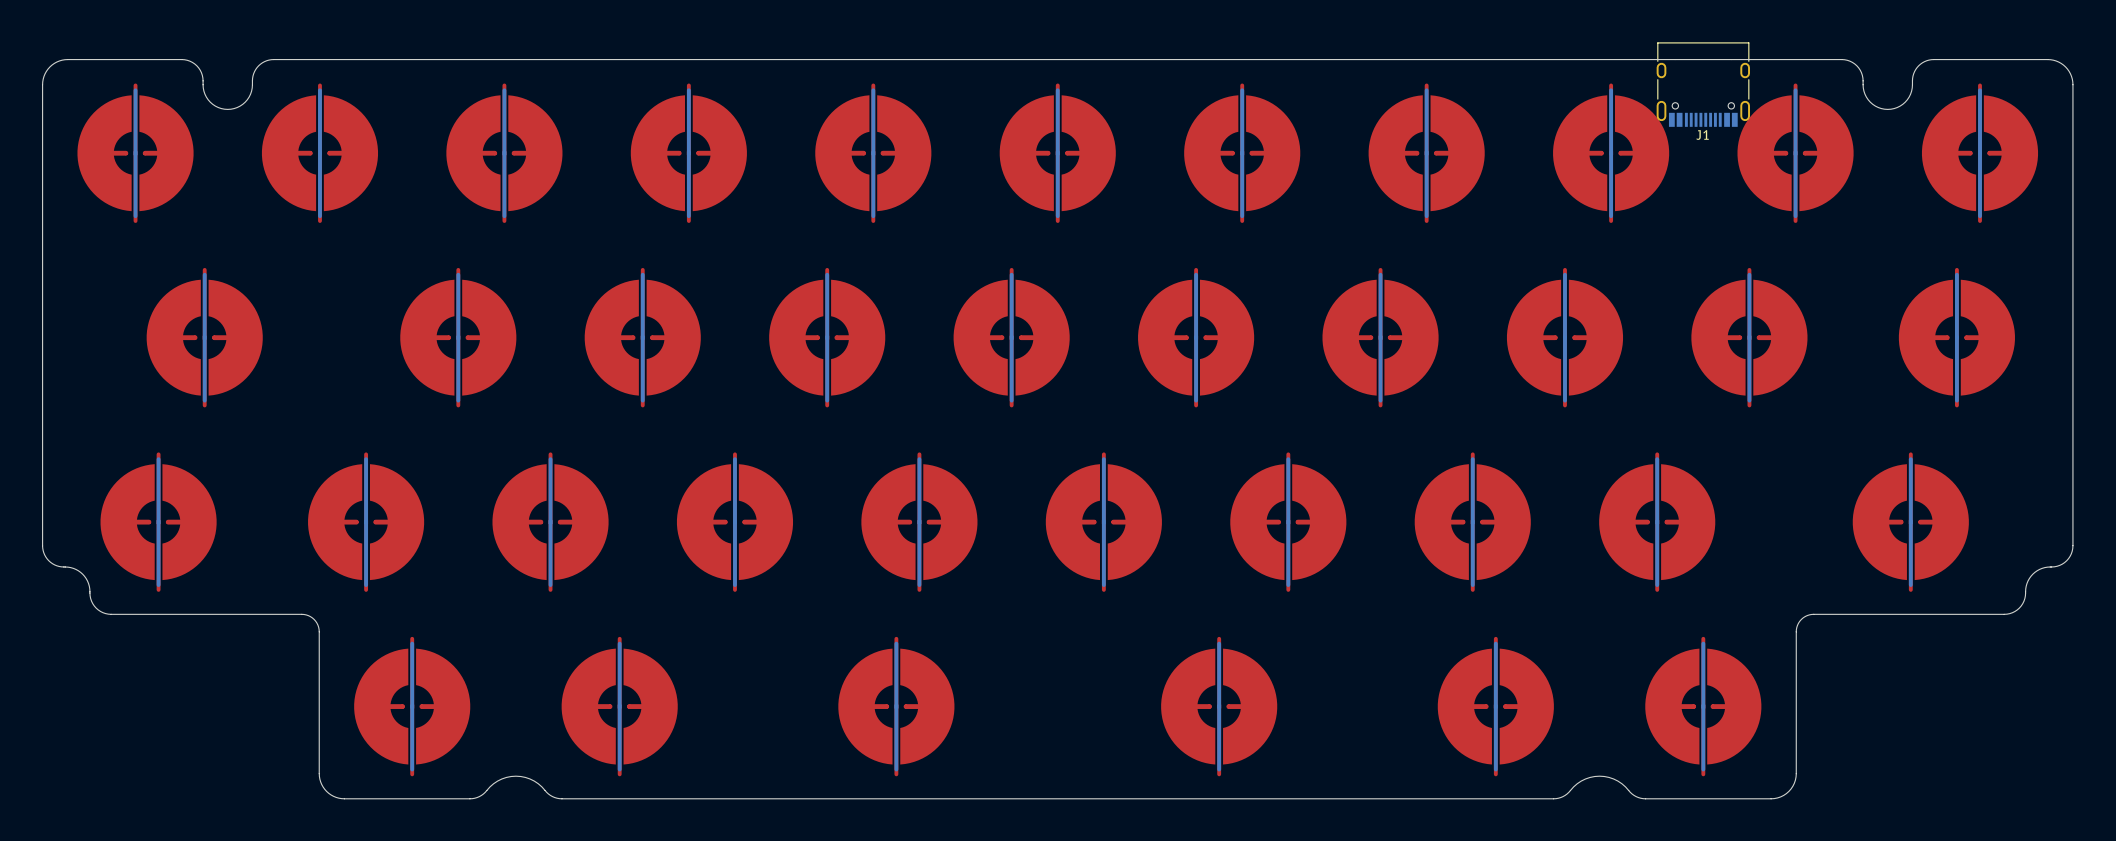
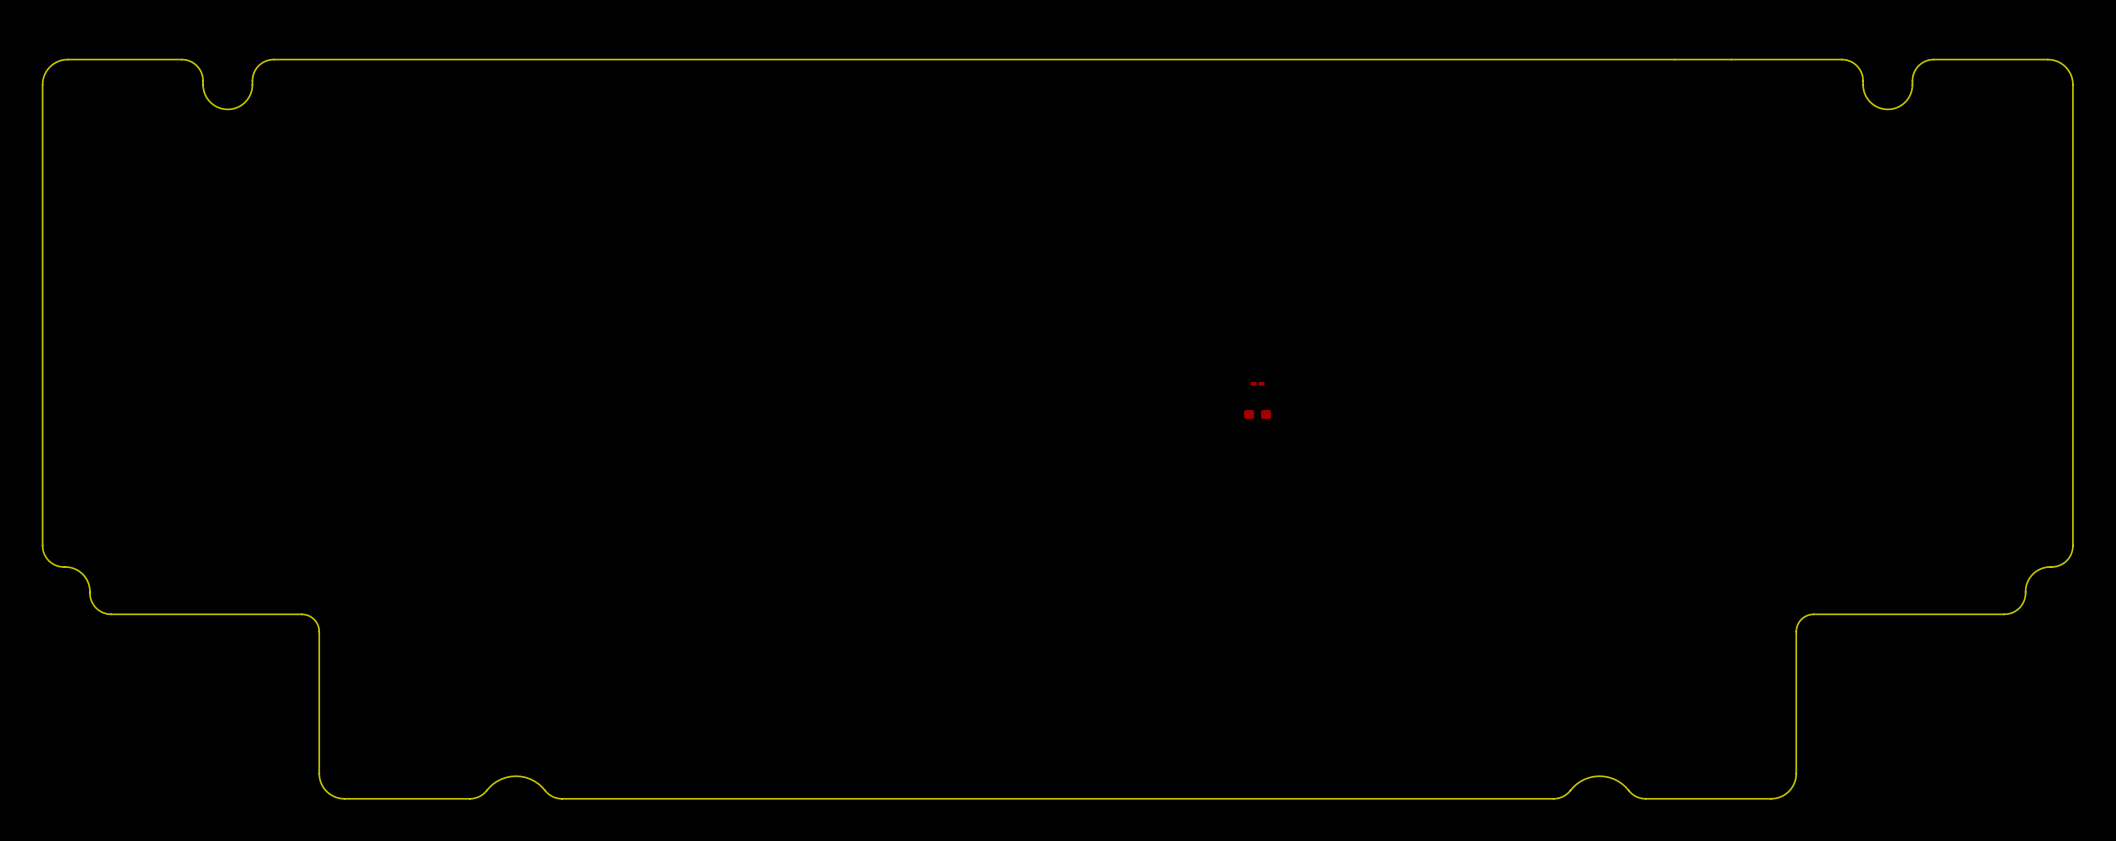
J1: (1703, 84) -> none
part: (135, 153) -> none
part: (319, 153) -> none
part: (504, 153) -> none
part: (688, 153) -> none
part: (873, 153) -> none
part: (1057, 153) -> none
part: (1242, 153) -> none
part: (1426, 153) -> none
part: (1611, 153) -> none
part: (1795, 153) -> none
part: (1980, 153) -> none
part: (204, 337) -> none
part: (458, 337) -> none
part: (642, 337) -> none
part: (827, 337) -> none
part: (1011, 337) -> none
part: (1196, 337) -> none
part: (1380, 337) -> none
part: (1564, 337) -> none
part: (1749, 337) -> none
part: (1956, 337) -> none
part: none -> (1257, 383)
part: none -> (1257, 414)
part: (158, 522) -> none
part: (366, 522) -> none
part: (550, 522) -> none
part: (734, 522) -> none
part: (919, 522) -> none
part: (1103, 522) -> none
part: (1288, 522) -> none
part: (1472, 522) -> none
part: (1657, 522) -> none
part: (1910, 522) -> none
part: (412, 706) -> none
part: (619, 706) -> none
part: (896, 706) -> none
part: (1219, 706) -> none
part: (1495, 706) -> none
part: (1703, 706) -> none

